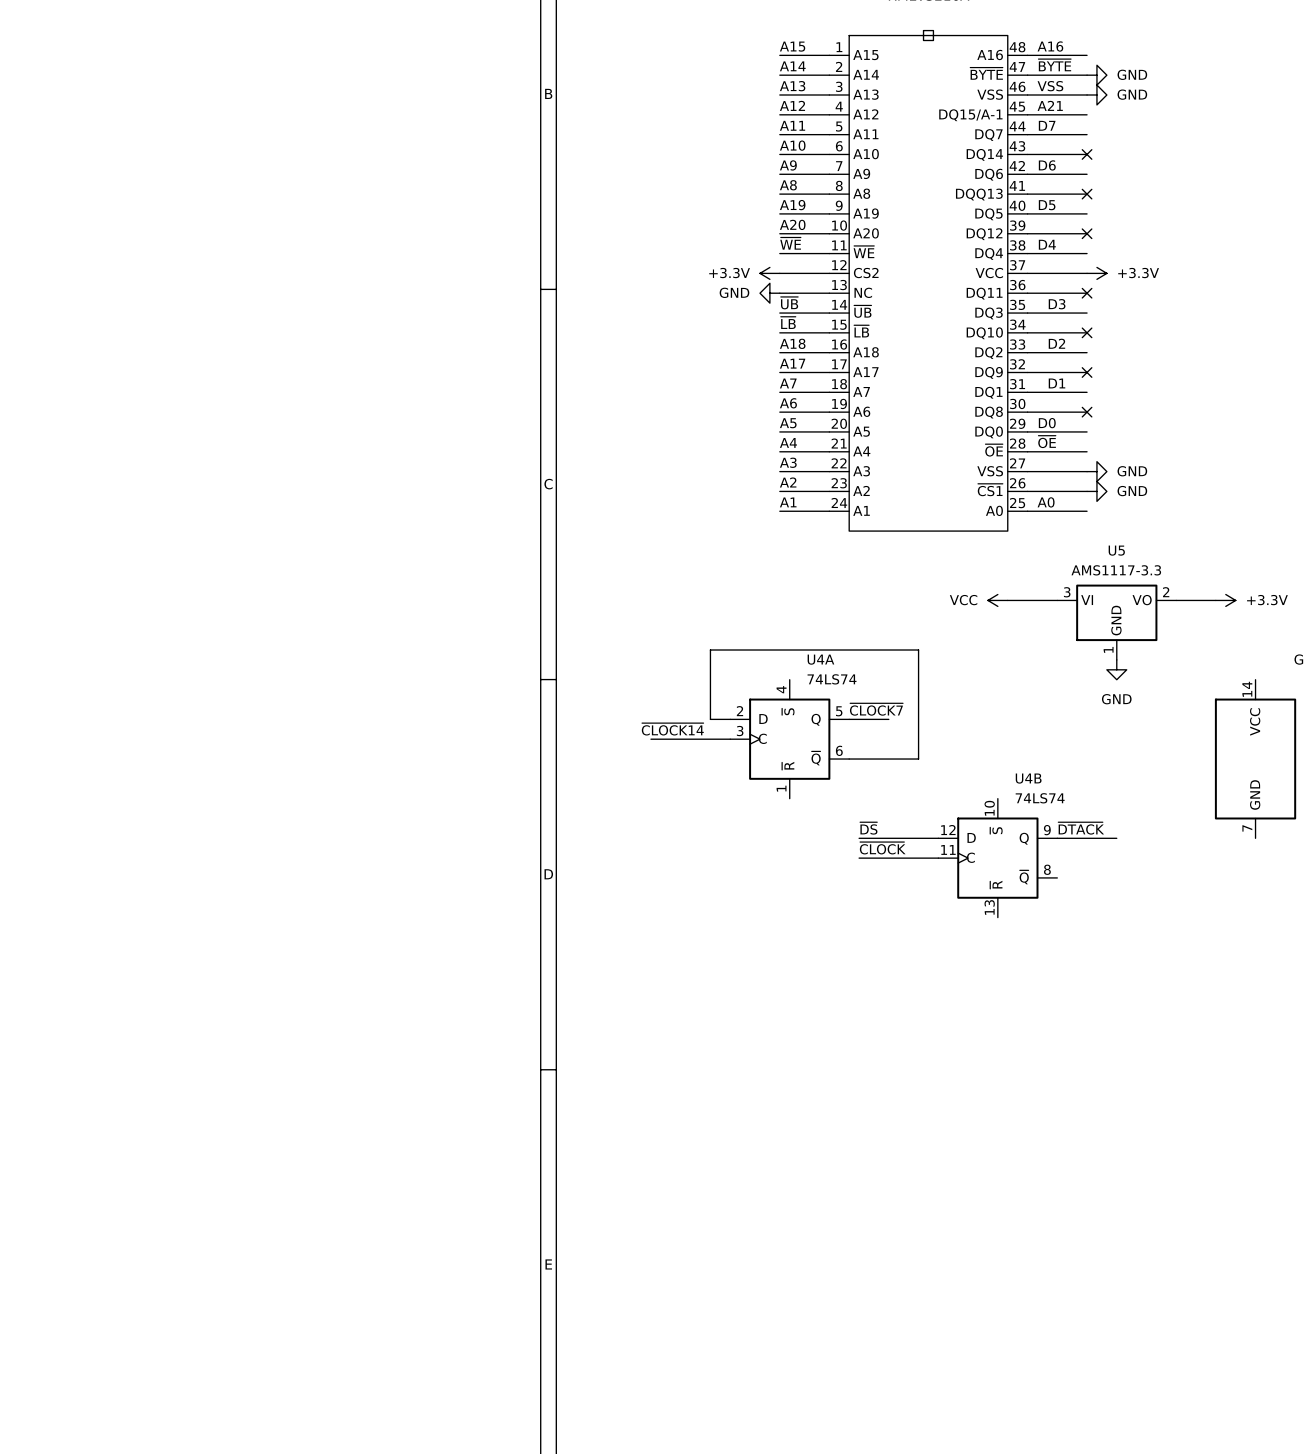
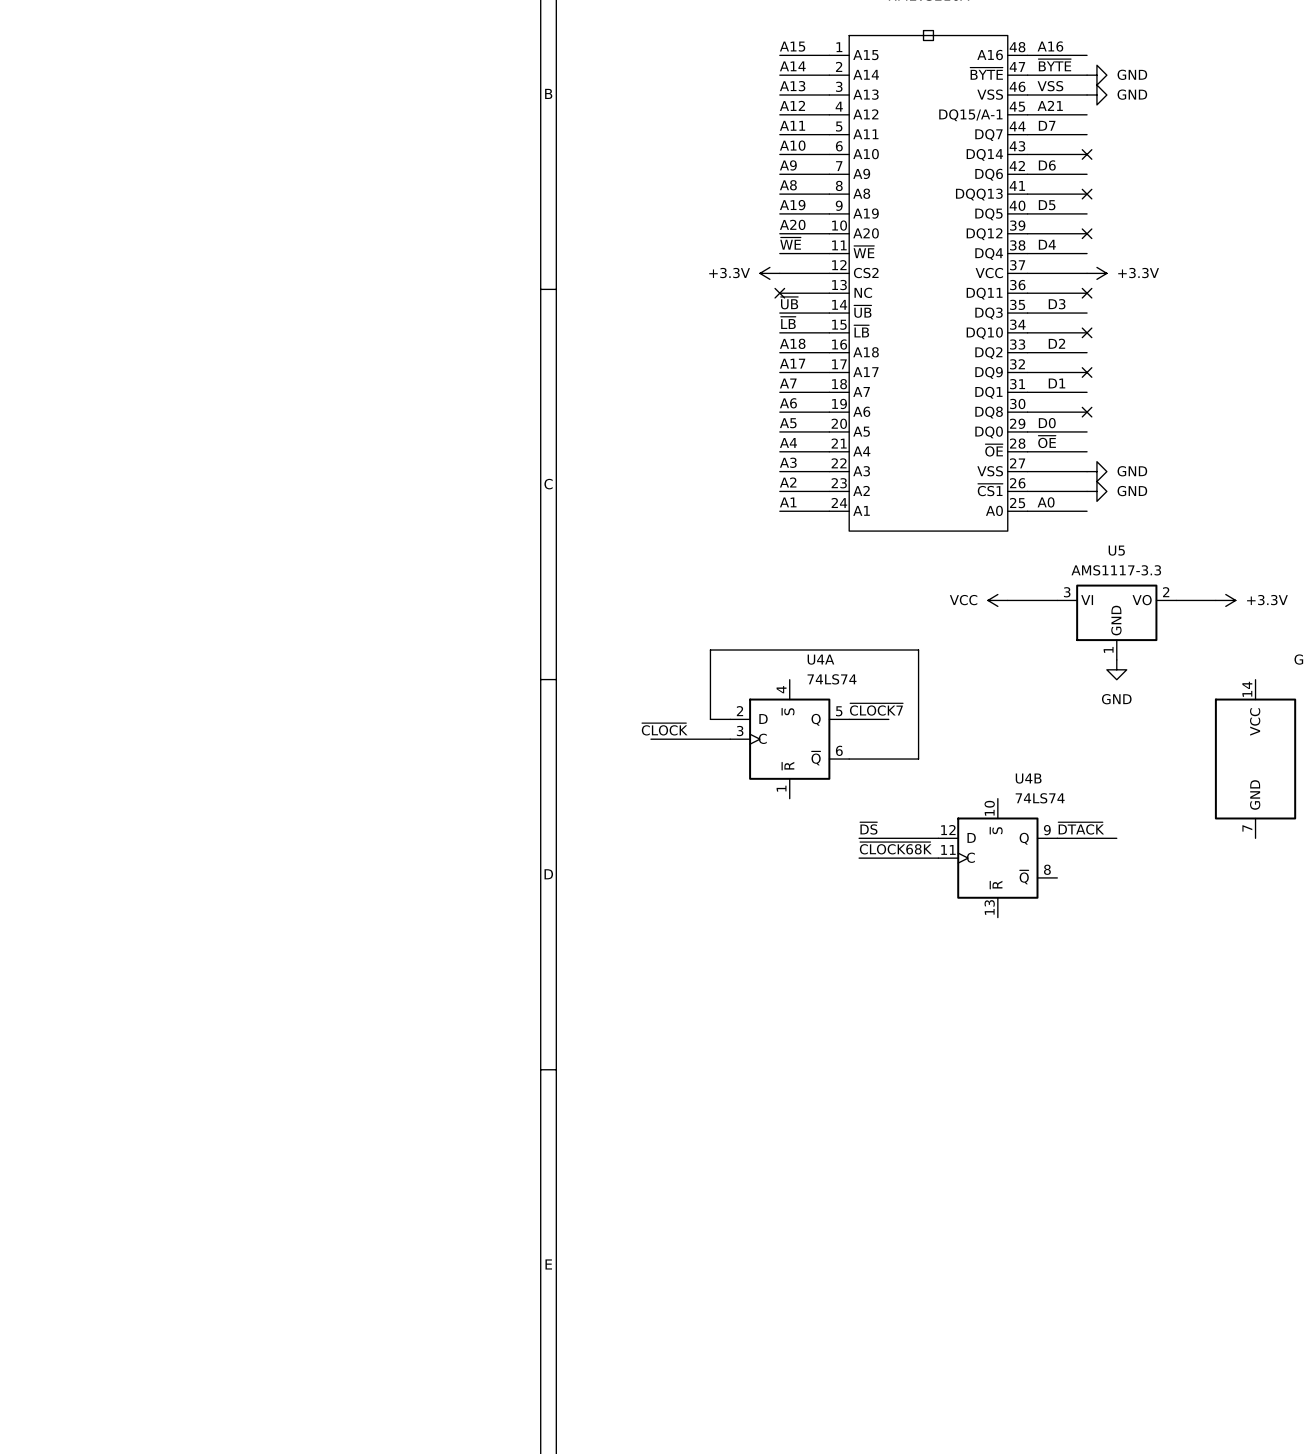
power symbol: GND (769, 293) -> none
no-connect mark: none -> (779, 293)
label: ~{CLOCK14} (672, 729) -> ~{CLOCK} (664, 729)
label: ~{CLOCK} (882, 848) -> ~{CLOCK68K} (895, 848)

